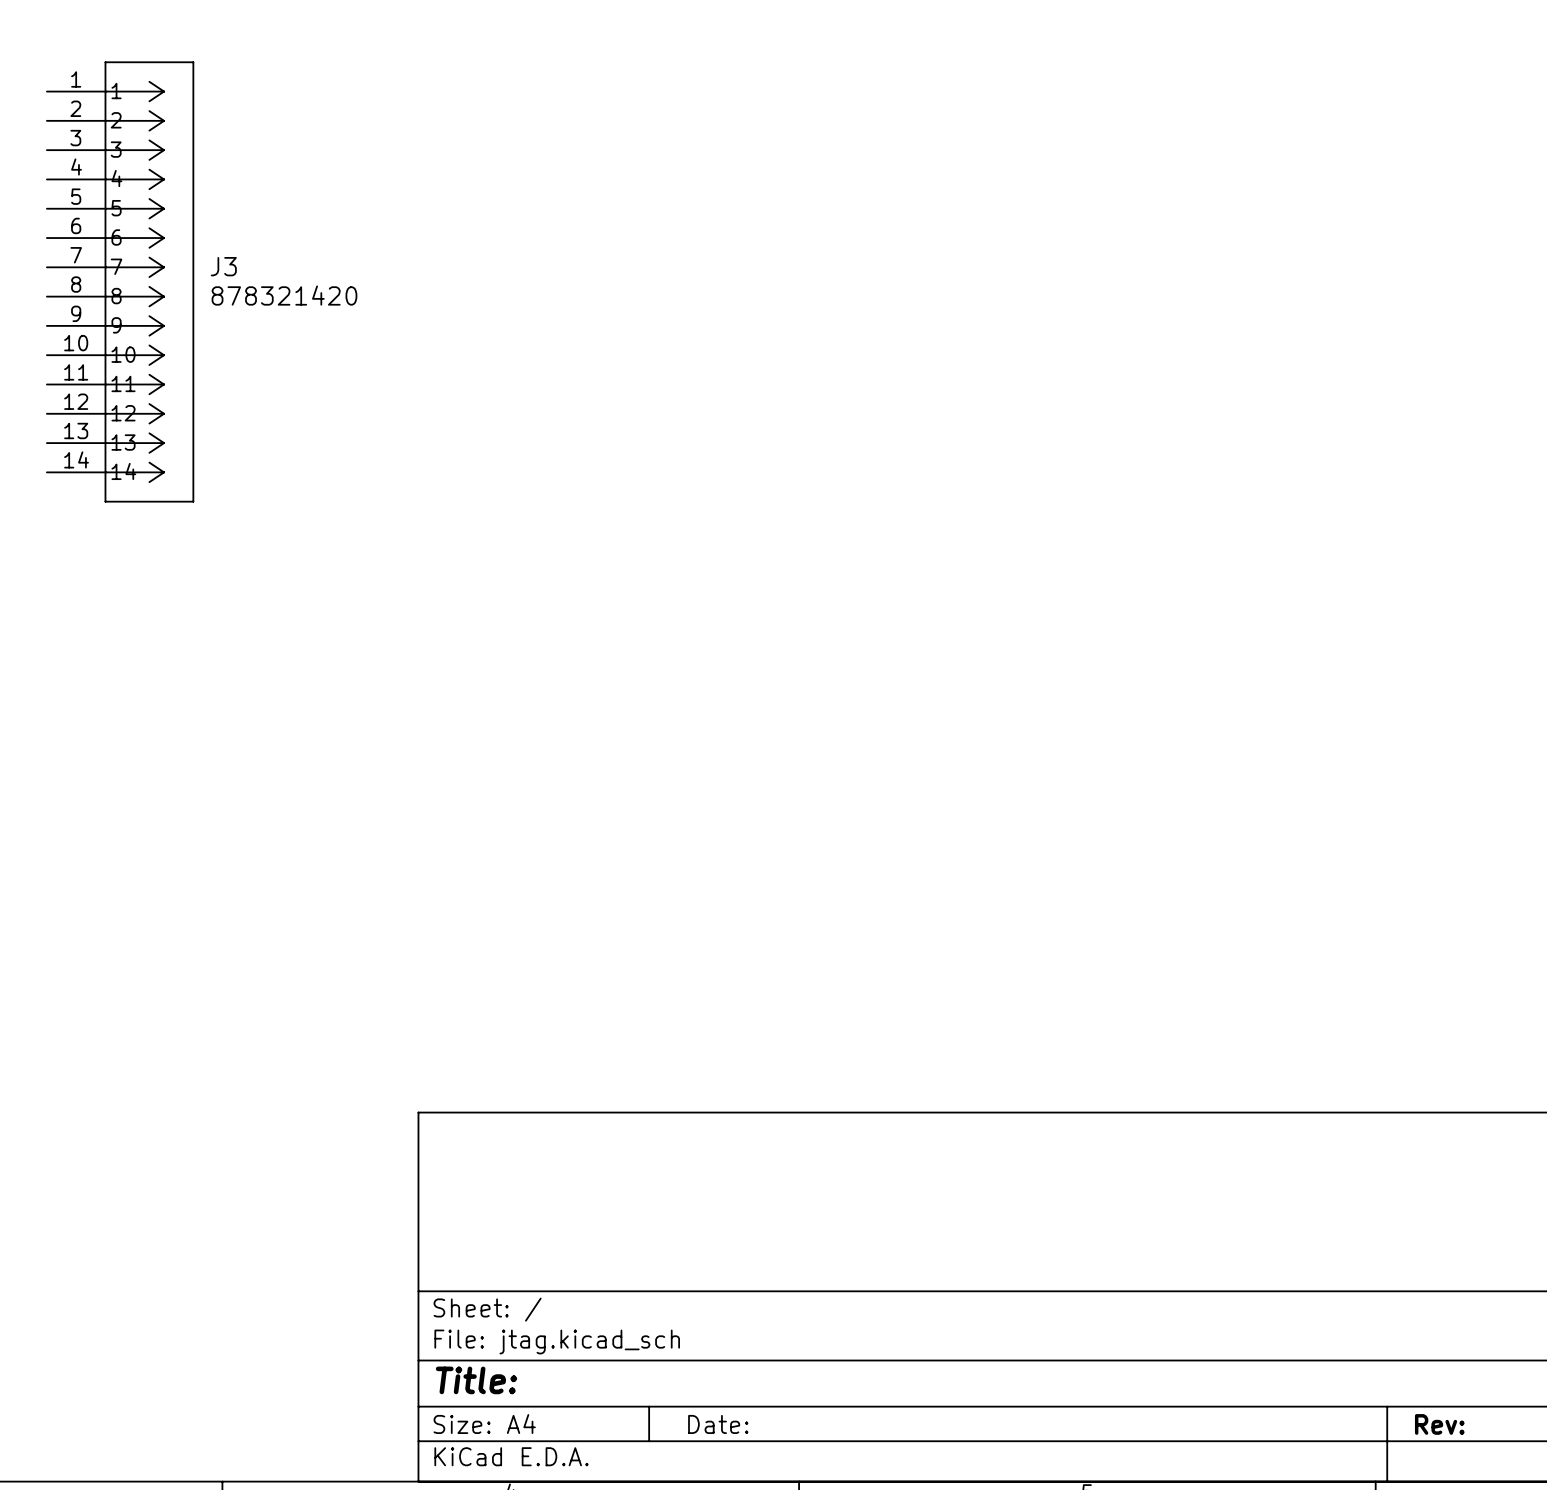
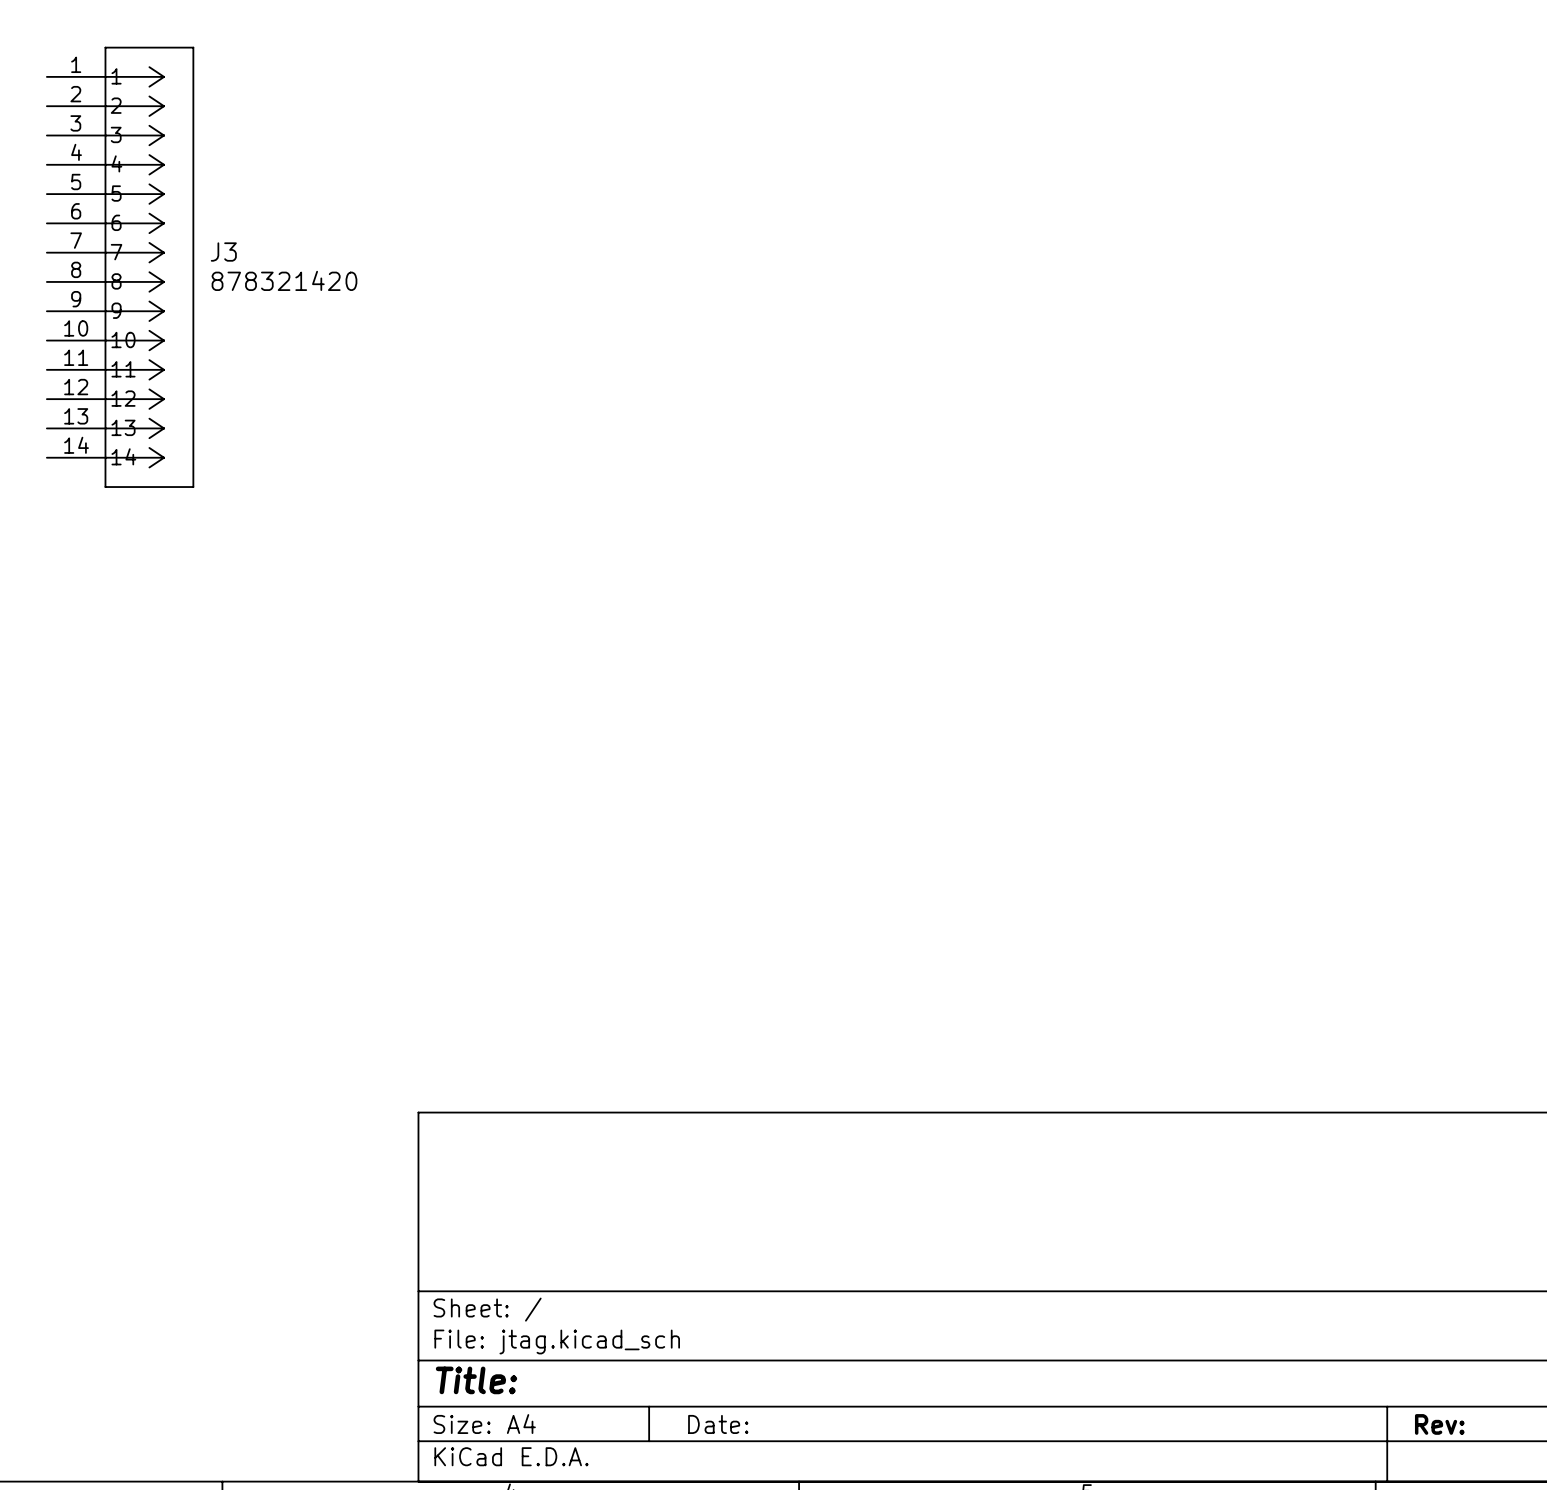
J3 position: (120, 281) -> (120, 267)

